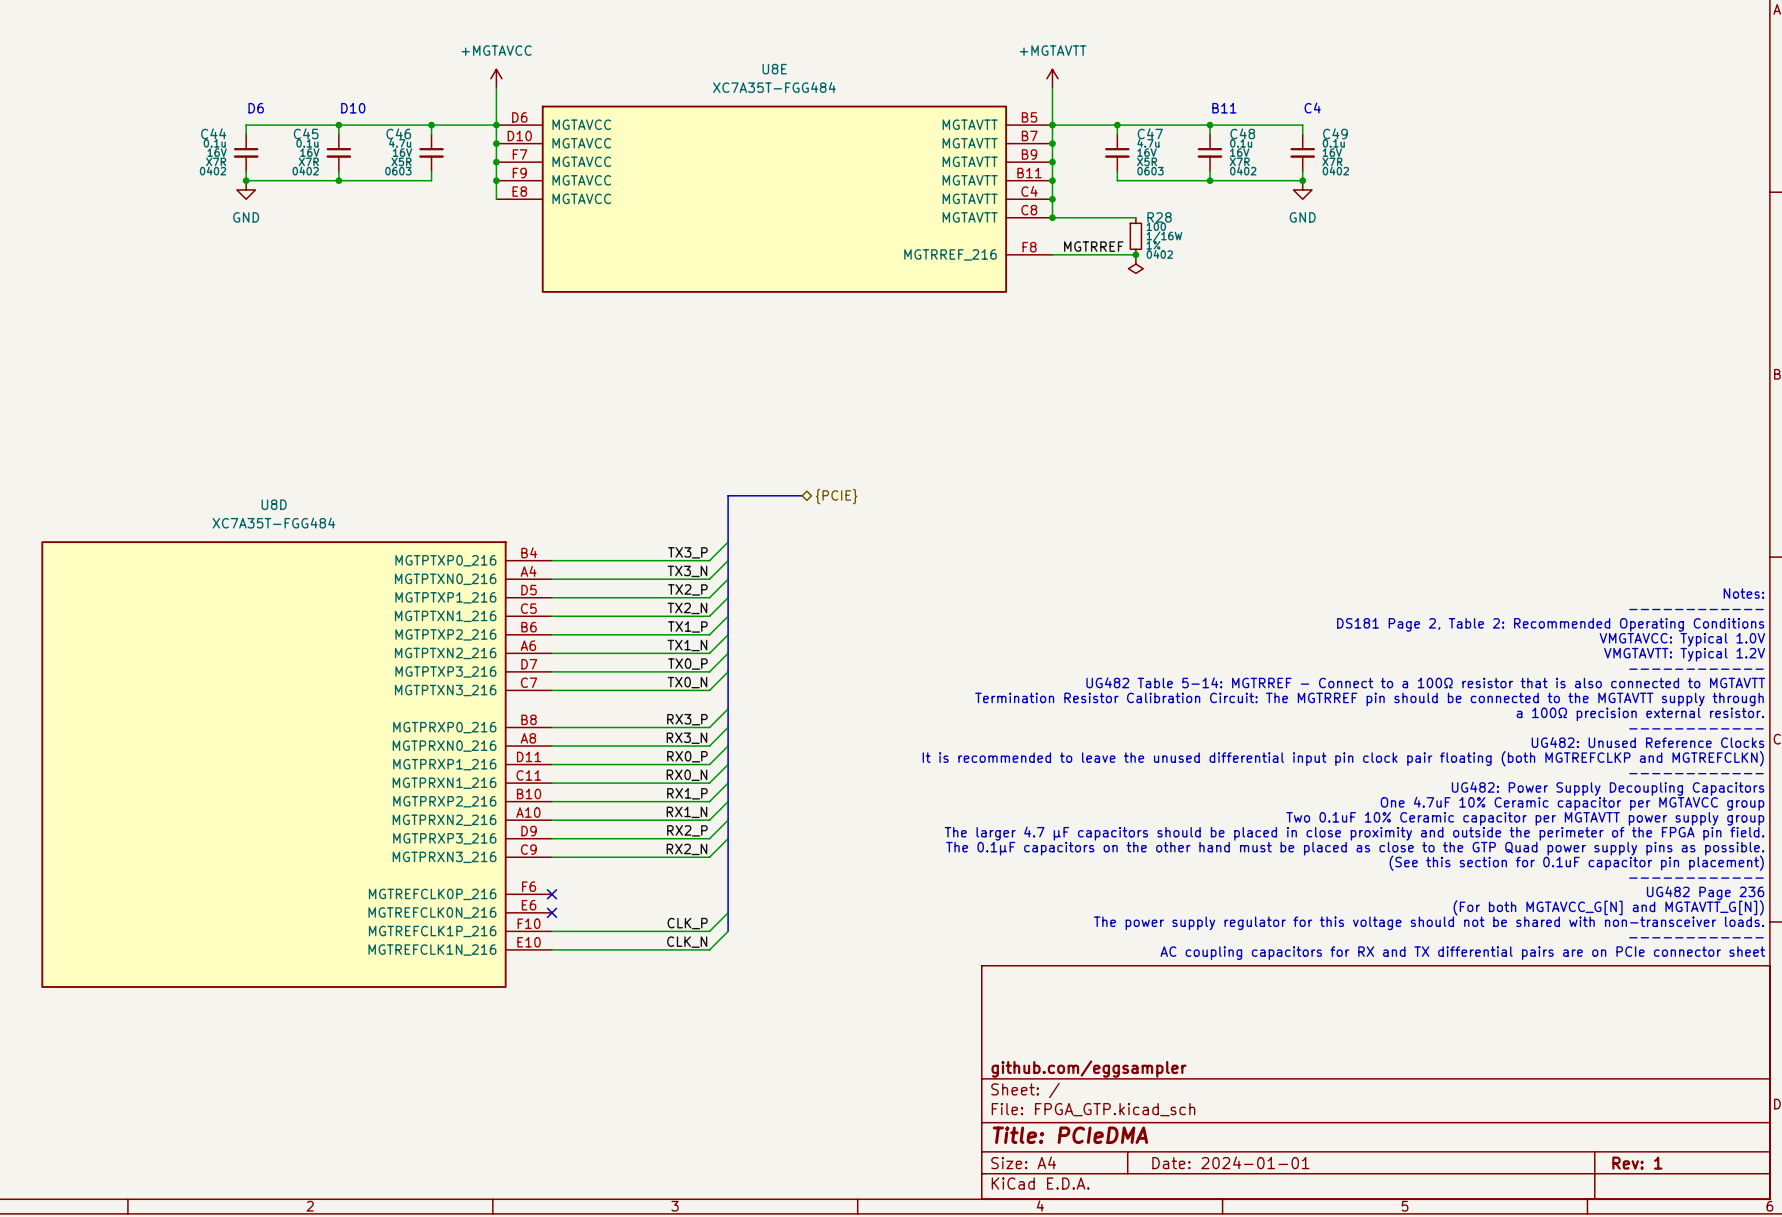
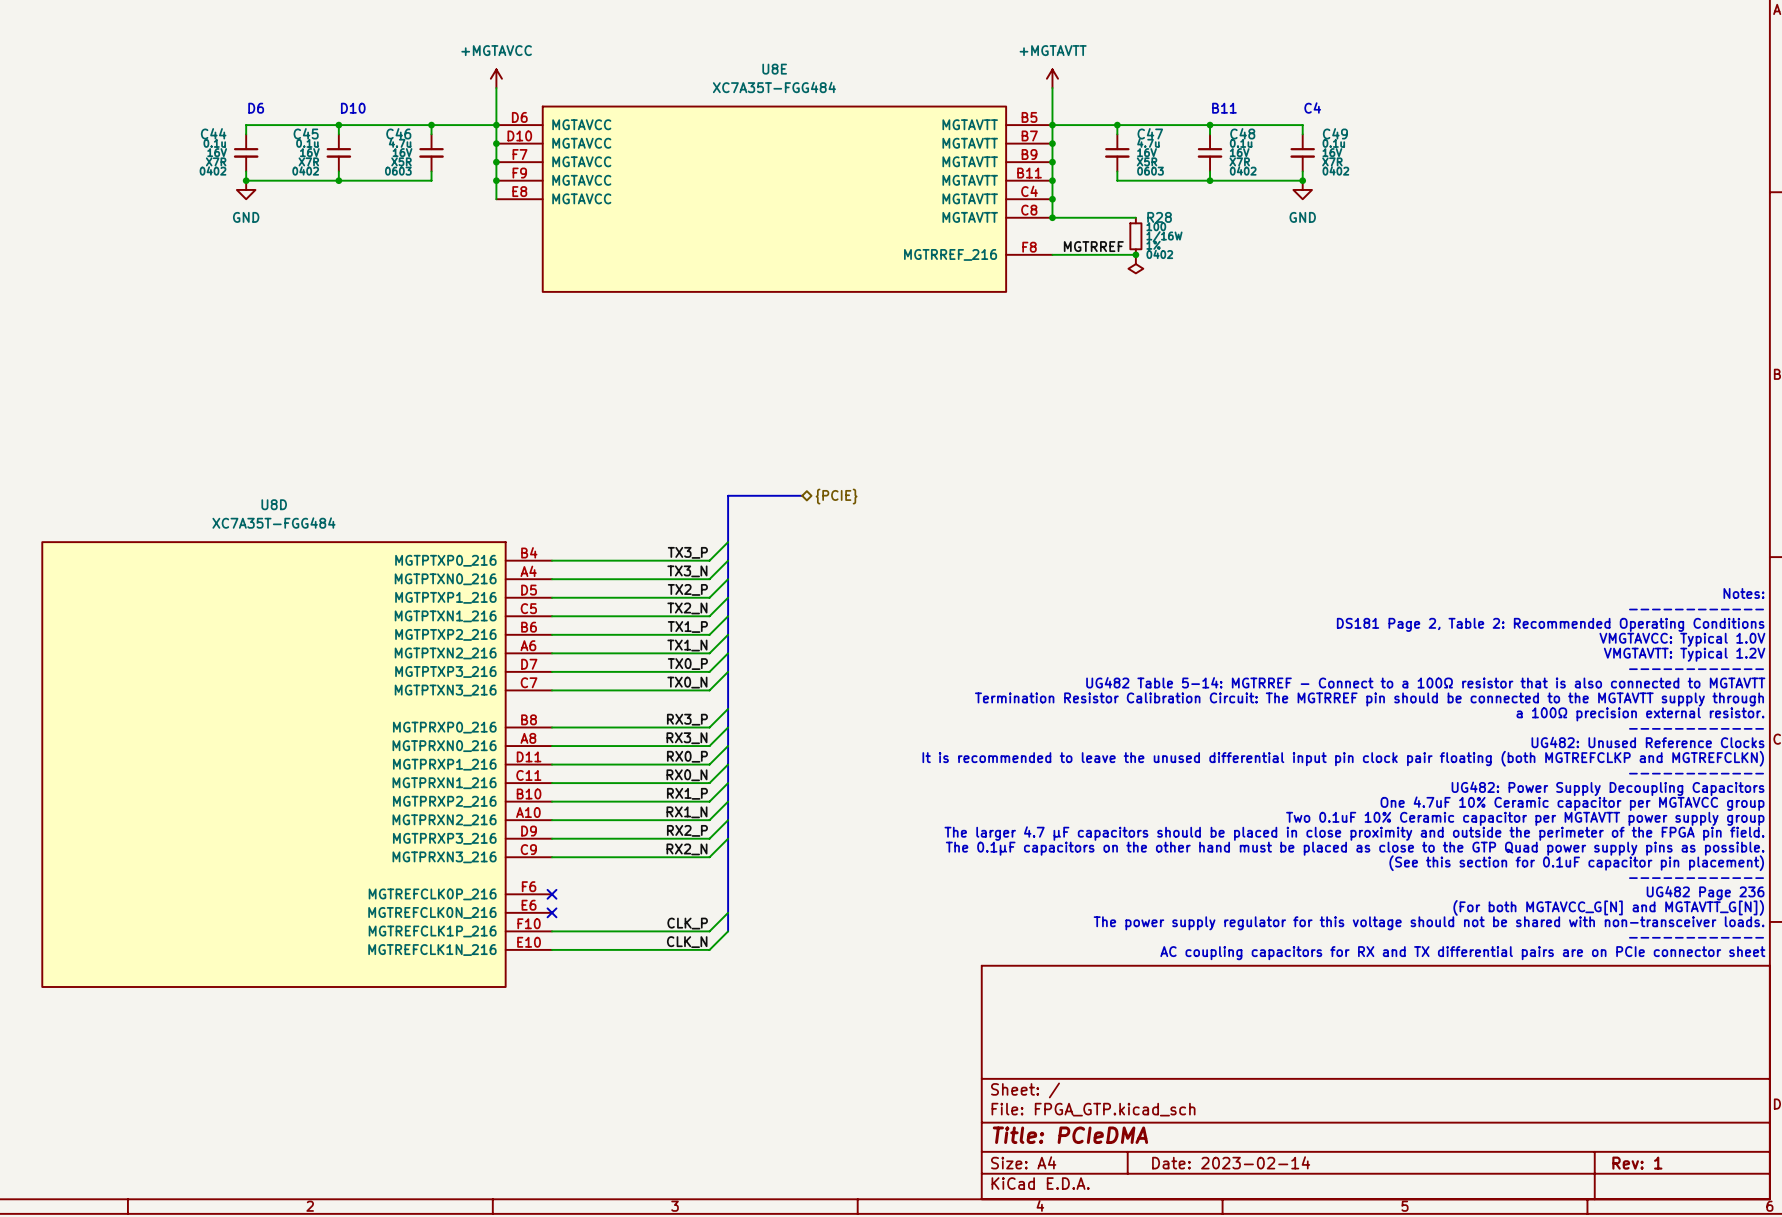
title block: github.com/eggsampler (1089, 1069) -> none
title block: Date: 2024-01-01 (1230, 1162) -> Date: 2023-02-14 (1231, 1162)

